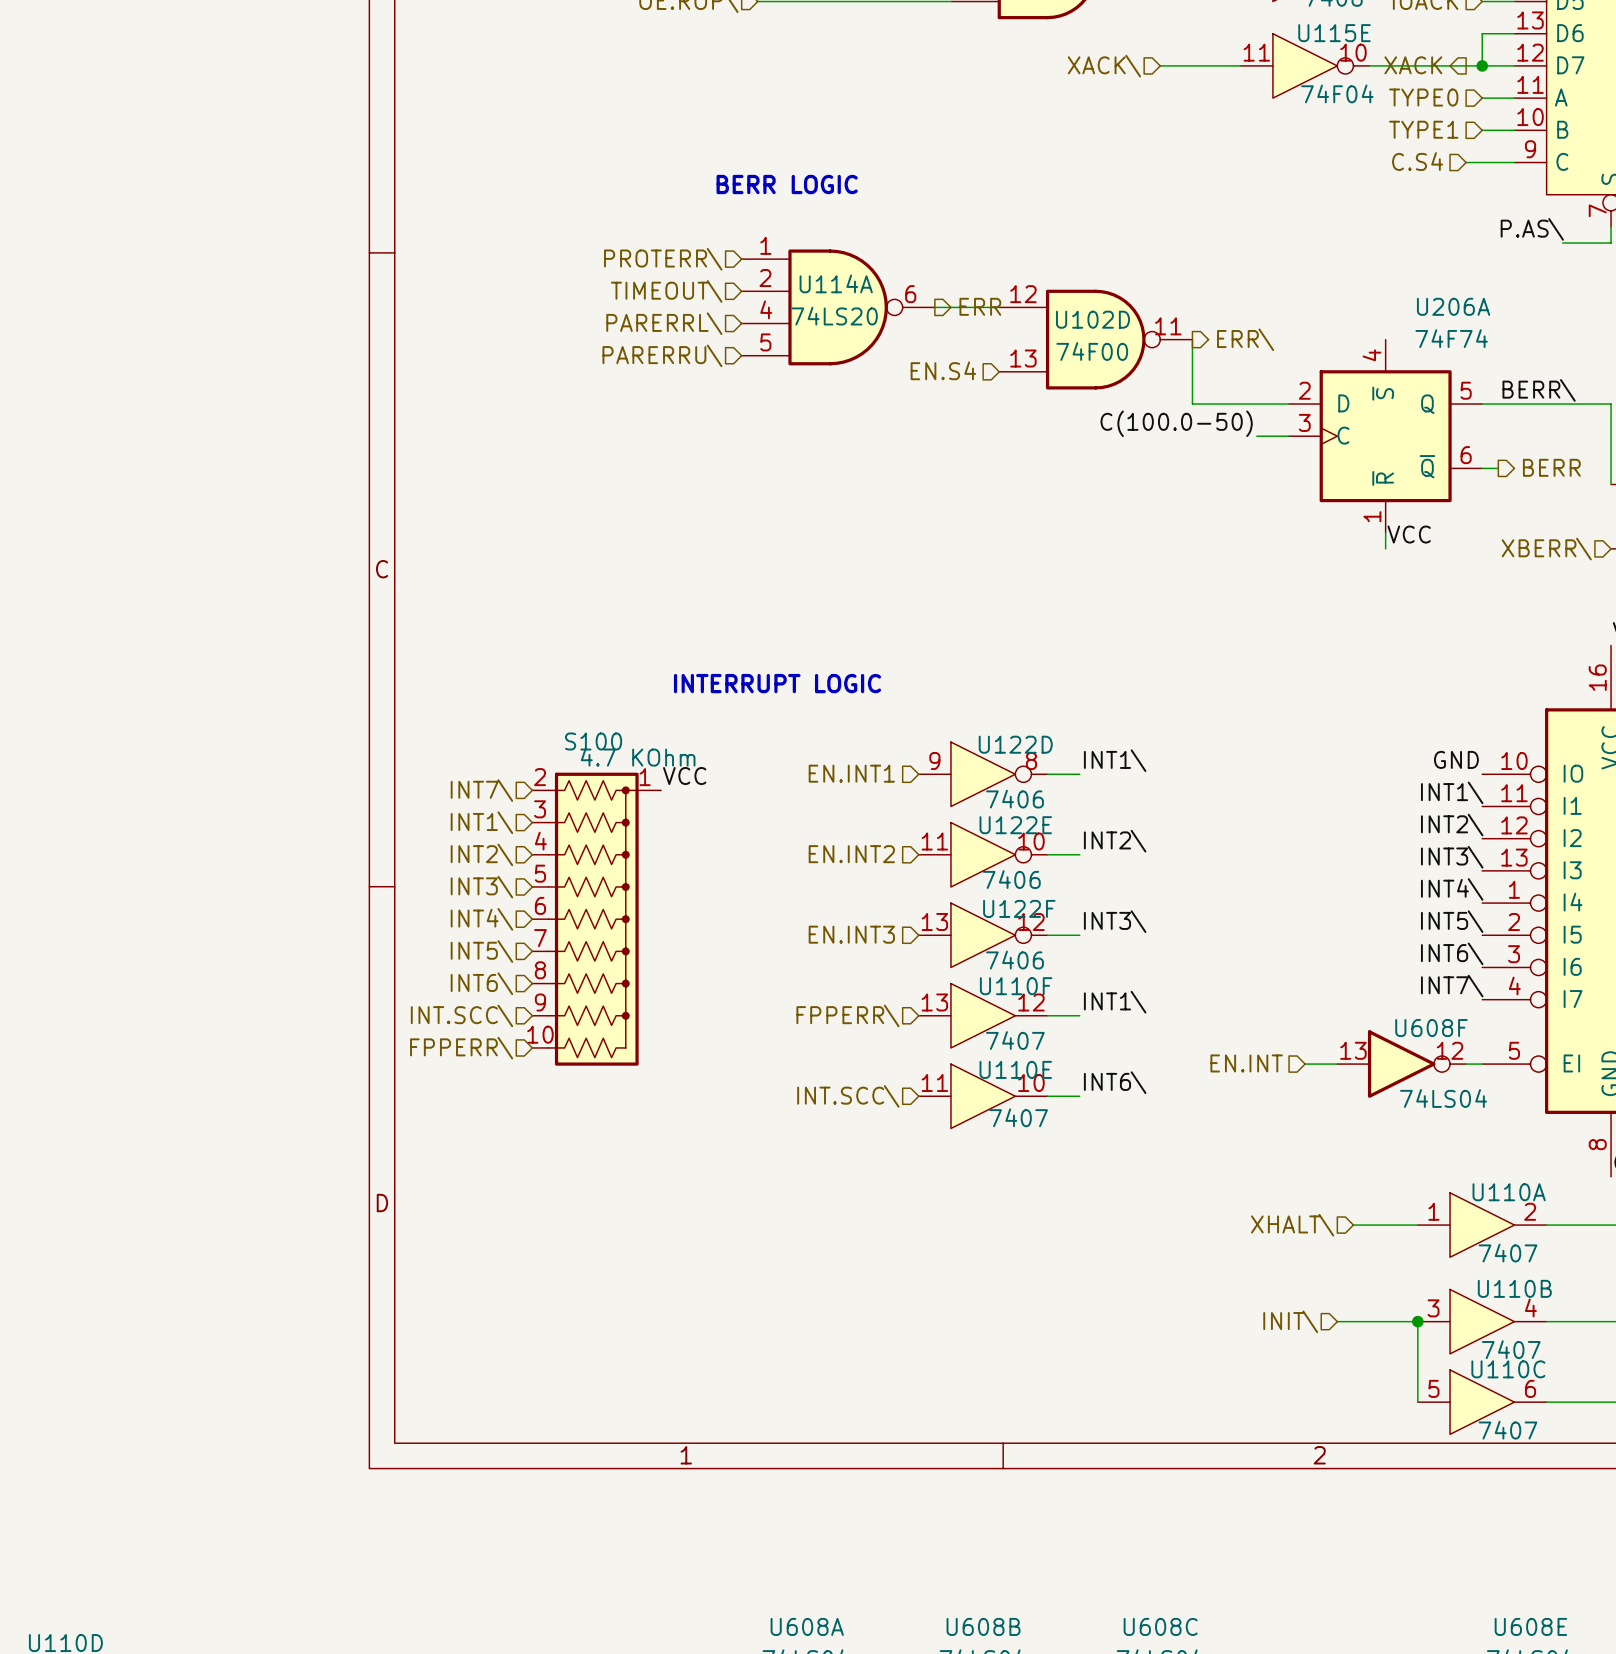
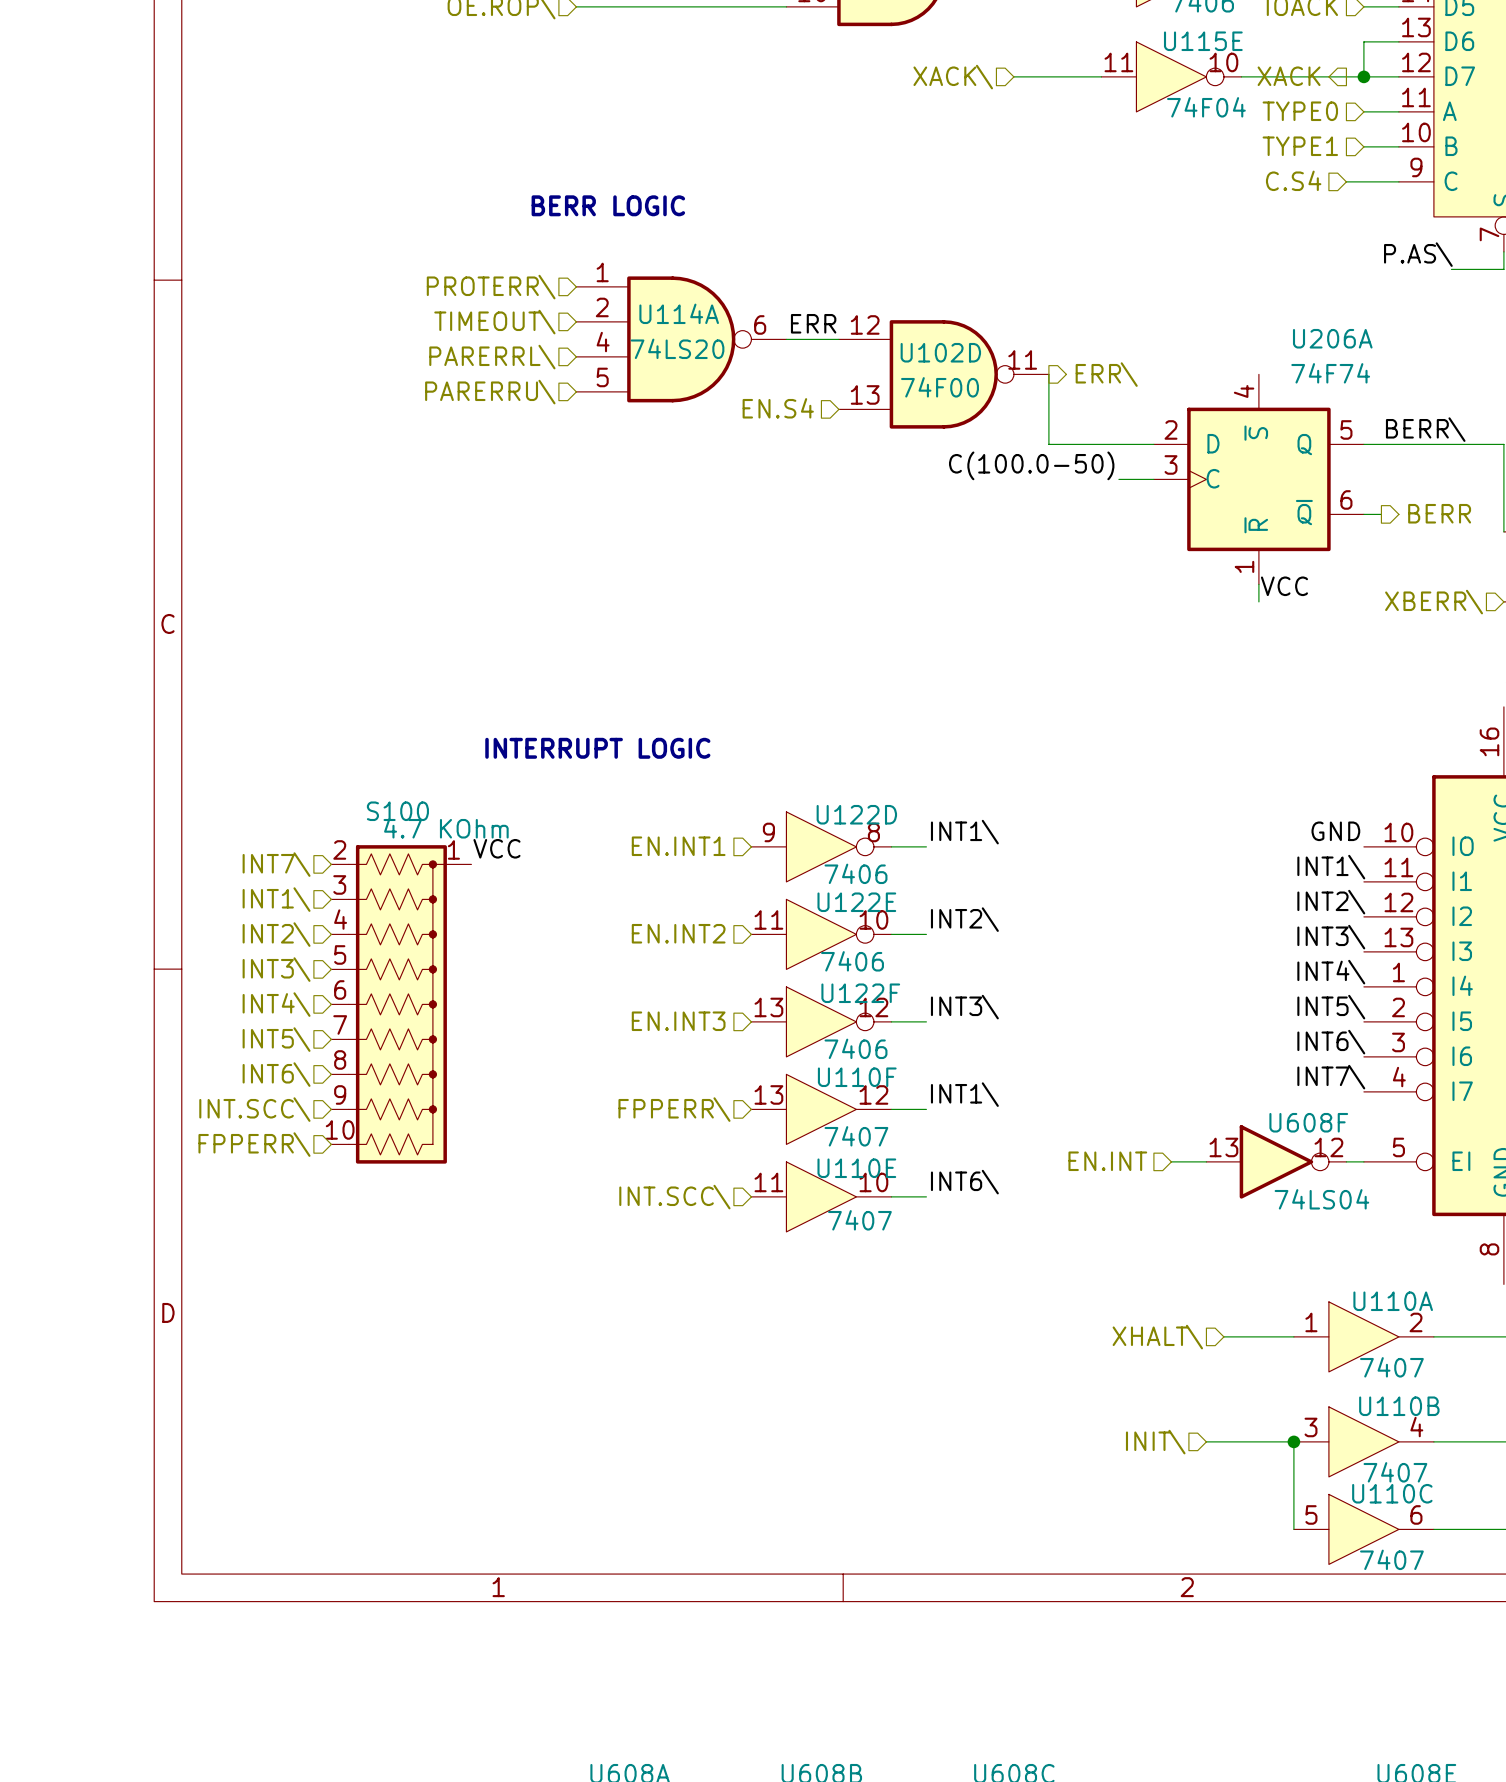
hierarchical label position: PROTERR\ (663, 259) -> PROTERR\ (491, 287)
hierarchical label position: TIMEOUT\ (666, 291) -> TIMEOUT\ (494, 322)
label: none -> ERR (813, 323)
hierarchical label: ERR (980, 306) -> none
U114A position: (838, 307) -> (681, 339)
hierarchical label position: PARERRL\ (664, 323) -> PARERRL\ (492, 357)
hierarchical label position: PARERRU\ (662, 355) -> PARERRU\ (490, 392)

